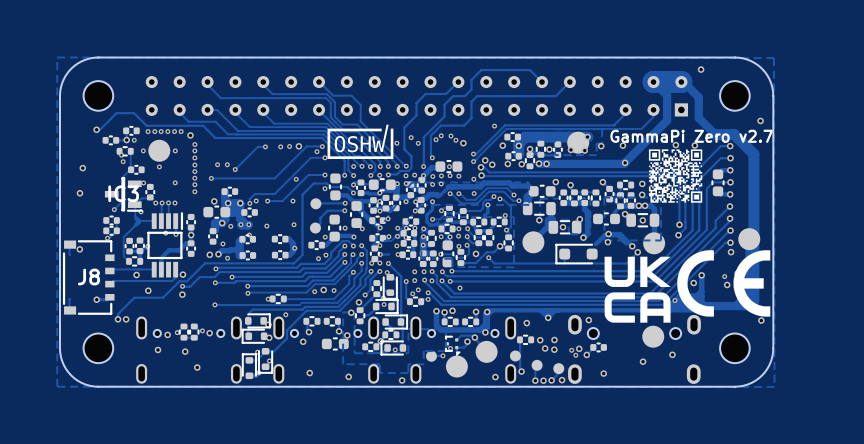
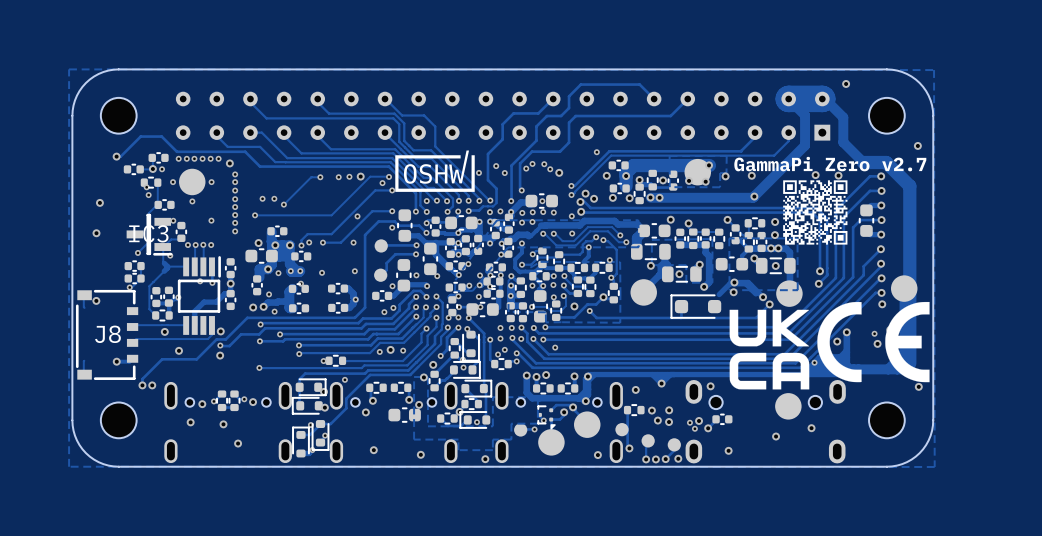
part footprint: [399, 250, 417, 260] -> [466, 301, 499, 318]

